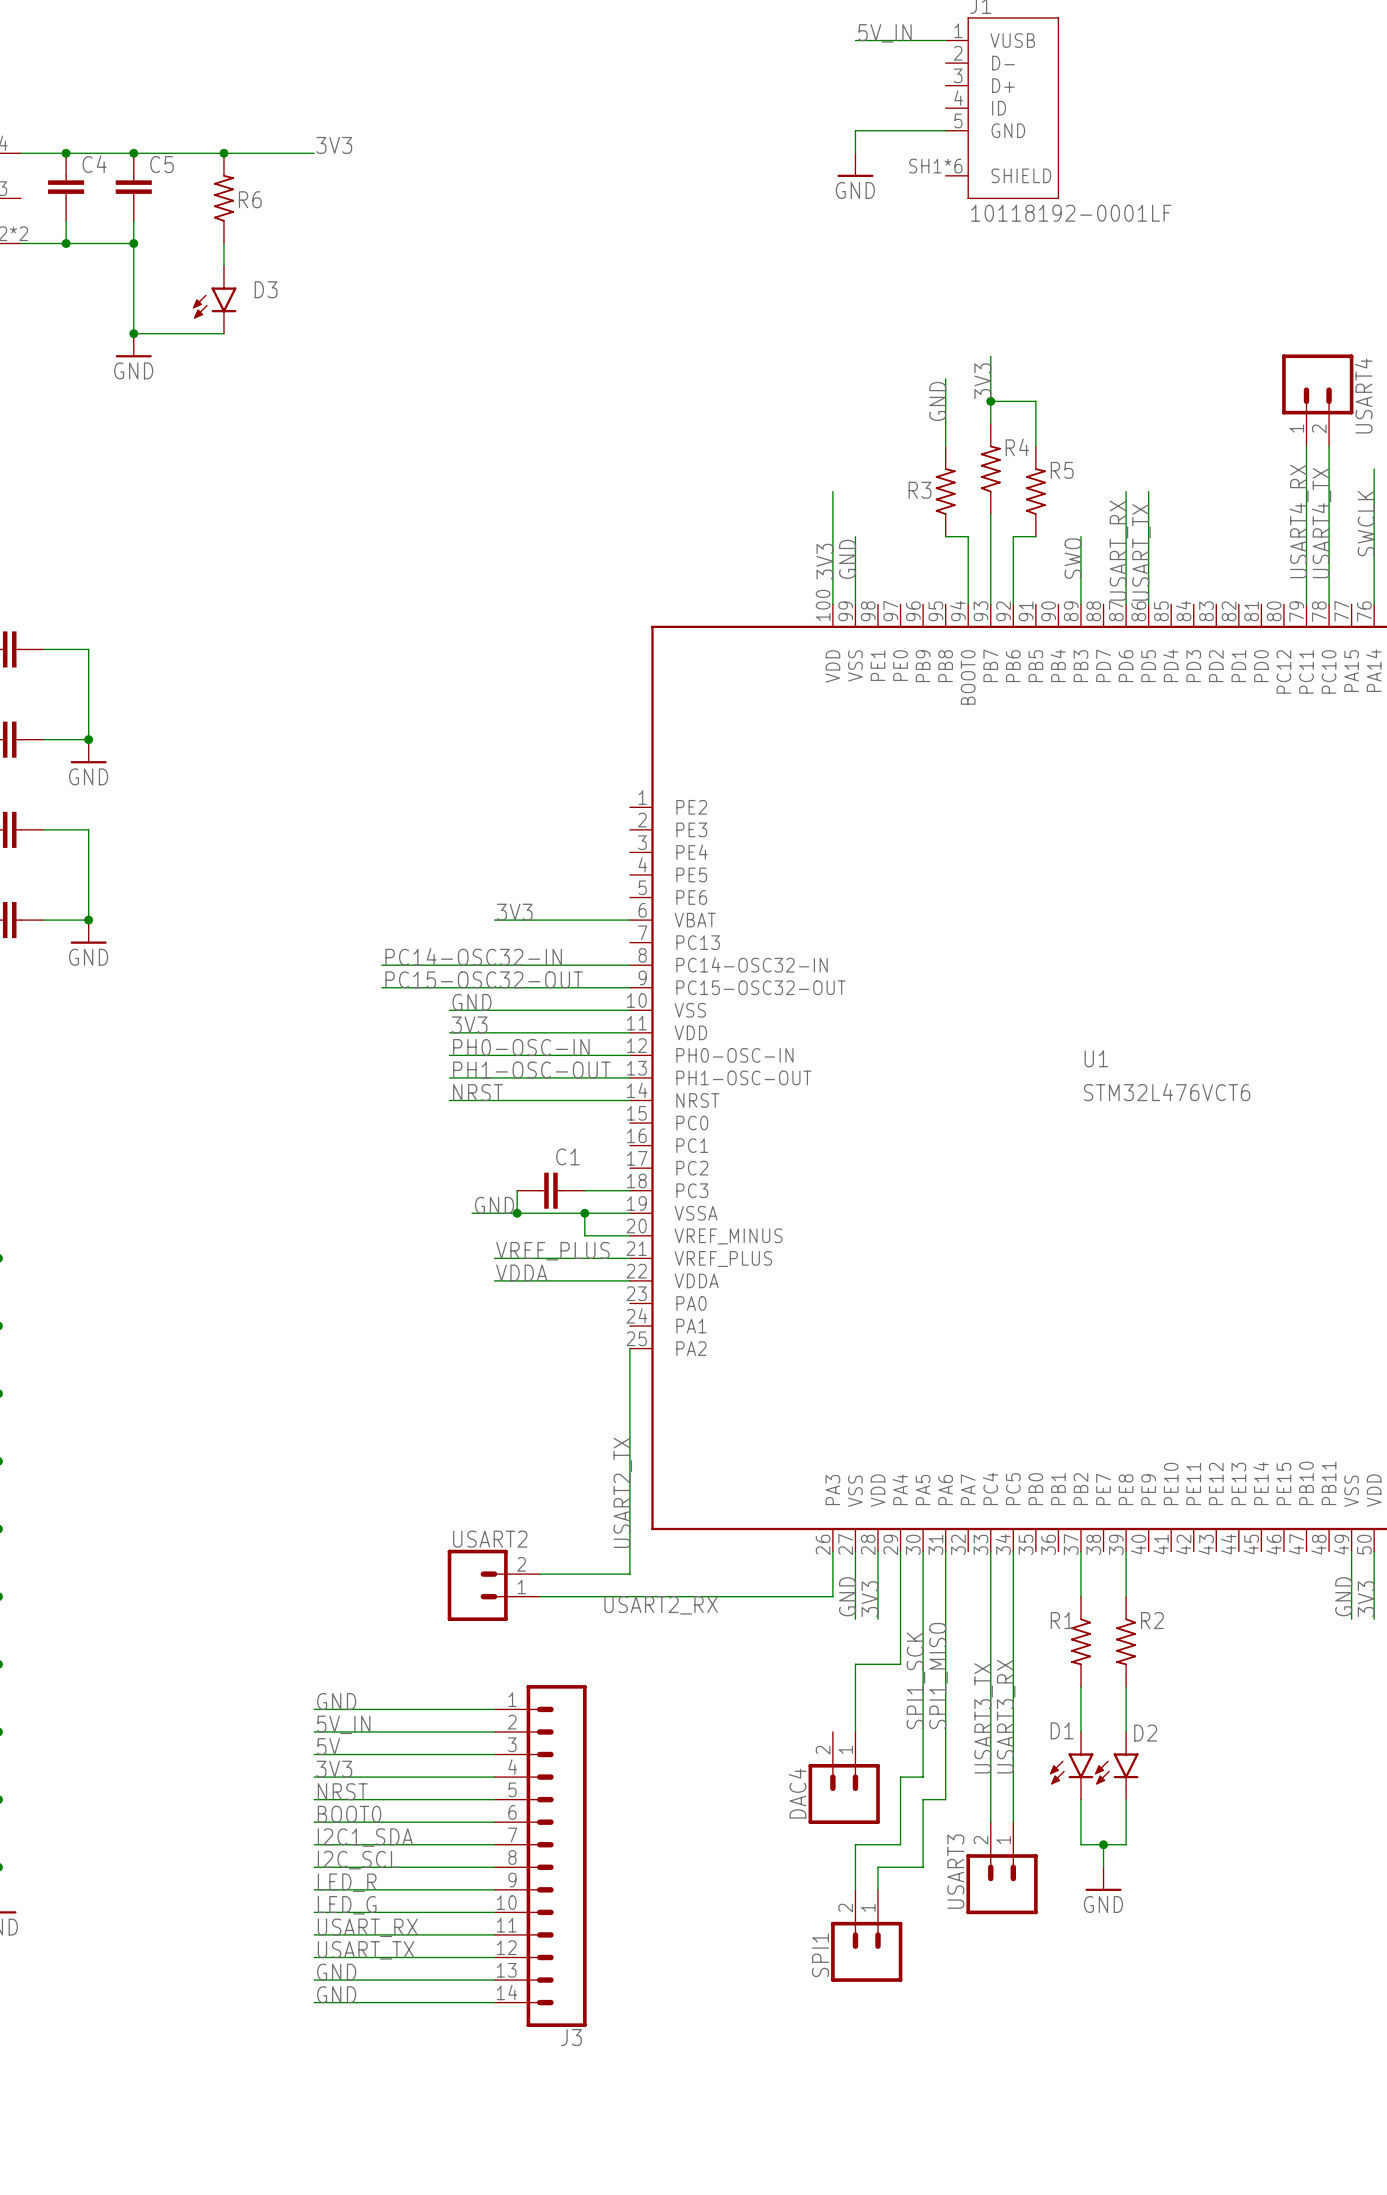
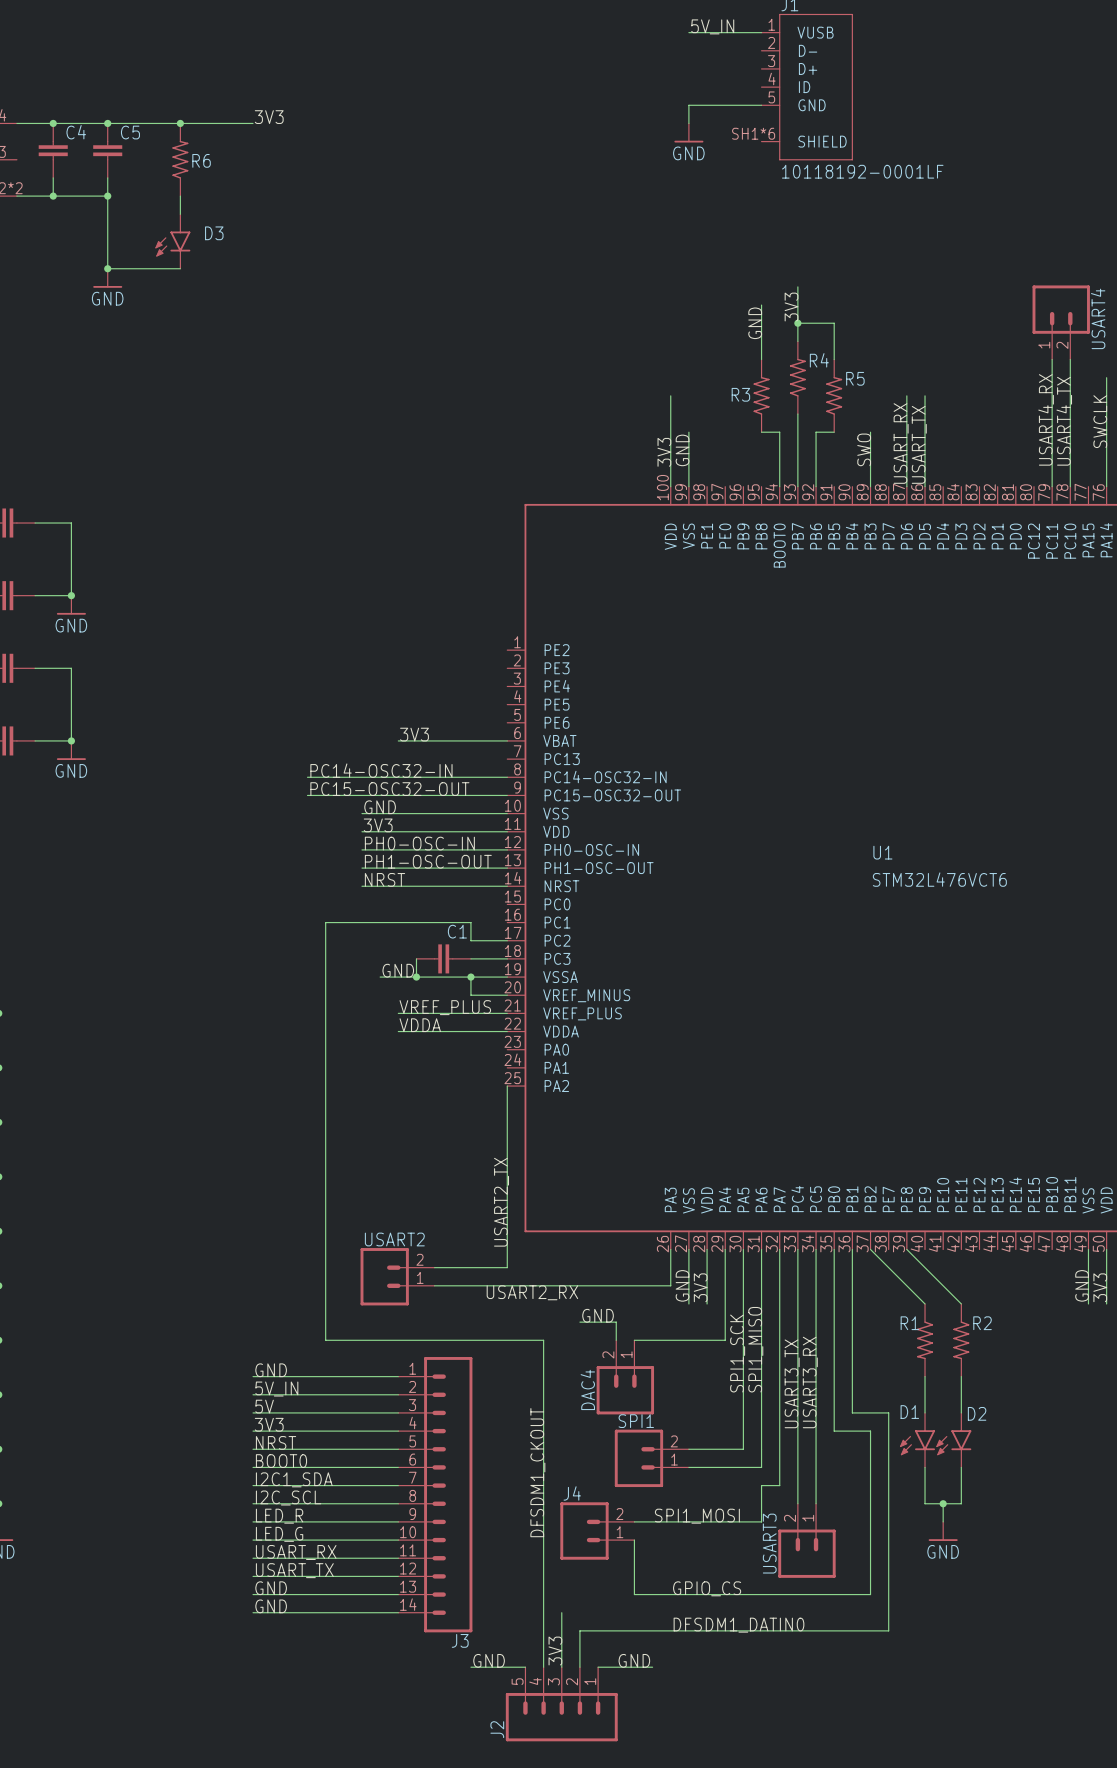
wire: none -> (507, 940) (470, 940) (470, 922) (325, 922) (325, 1340) (543, 1340) (543, 1667)
wire: none -> (779, 1249) (779, 1485) (761, 1485) (761, 1521) (634, 1521)
wire: none -> (834, 1249) (834, 1431) (870, 1431) (870, 1449)
wire: none -> (852, 1249) (852, 1412) (888, 1412) (888, 1485)
wire: (1080, 1551) (1080, 1596) -> (870, 1249) (925, 1303)
wire: (1126, 1551) (1126, 1596) -> (906, 1249) (961, 1303)
label: none -> GND (598, 1315)
wire: none -> (579, 1322) (616, 1322) (616, 1340)
R1 position: (1080, 1641) -> (925, 1340)
R2 position: (1126, 1641) -> (961, 1340)
wire: (855, 1664) (855, 1731) -> (688, 1340) (634, 1340)
wire: (1080, 1686) (1080, 1731) -> (925, 1376) (925, 1412)
wire: (1126, 1686) (1126, 1731) -> (961, 1376) (961, 1412)
D1 position: (1071, 1765) -> (917, 1440)
D2 position: (1116, 1765) -> (953, 1440)
DAC4 position: (844, 1777) -> (625, 1377)
wire: (923, 1777) (900, 1777) (900, 1844) (855, 1844) (855, 1889) -> (743, 1431) (743, 1449) (688, 1449)
wire: (945, 1799) (923, 1799) (923, 1867) (878, 1867) (878, 1889) -> (761, 1449) (761, 1467) (688, 1467)
wire: (1126, 1799) (1126, 1844) (1080, 1844) -> (634, 1540) (634, 1594) (870, 1594) (870, 1485)
wire: none -> (925, 1467) (925, 1503) (961, 1503) (961, 1467)
label: none -> DFSDM1_CKOUT (537, 1472)
junction: (1103, 1844) -> none
wire: none -> (888, 1503) (888, 1630) (579, 1630) (579, 1667)
wire: none -> (943, 1503) (943, 1521)
junction: none -> (943, 1503)
USART3 position: (1002, 1868) -> (806, 1540)
power symbol position: GND (1103, 1879) -> GND (943, 1531)
label: none -> SPI1_MOSI (697, 1516)
J4: none -> (597, 1531)
SPI1 position: (866, 1935) -> (651, 1458)
SPI1 rotation: 0° (866, 1951) -> 90° clockwise (638, 1458)
label: none -> GPIO_CS (707, 1588)
wire: none -> (561, 1612) (561, 1667)
label: none -> DFSDM1_DATIN0 (738, 1625)
label: none -> 3V3 (555, 1651)
label: none -> GND (489, 1660)
label: none -> GND (634, 1660)
wire: none -> (470, 1667) (525, 1667)
wire: none -> (598, 1667) (652, 1667)
J2: none -> (561, 1704)

